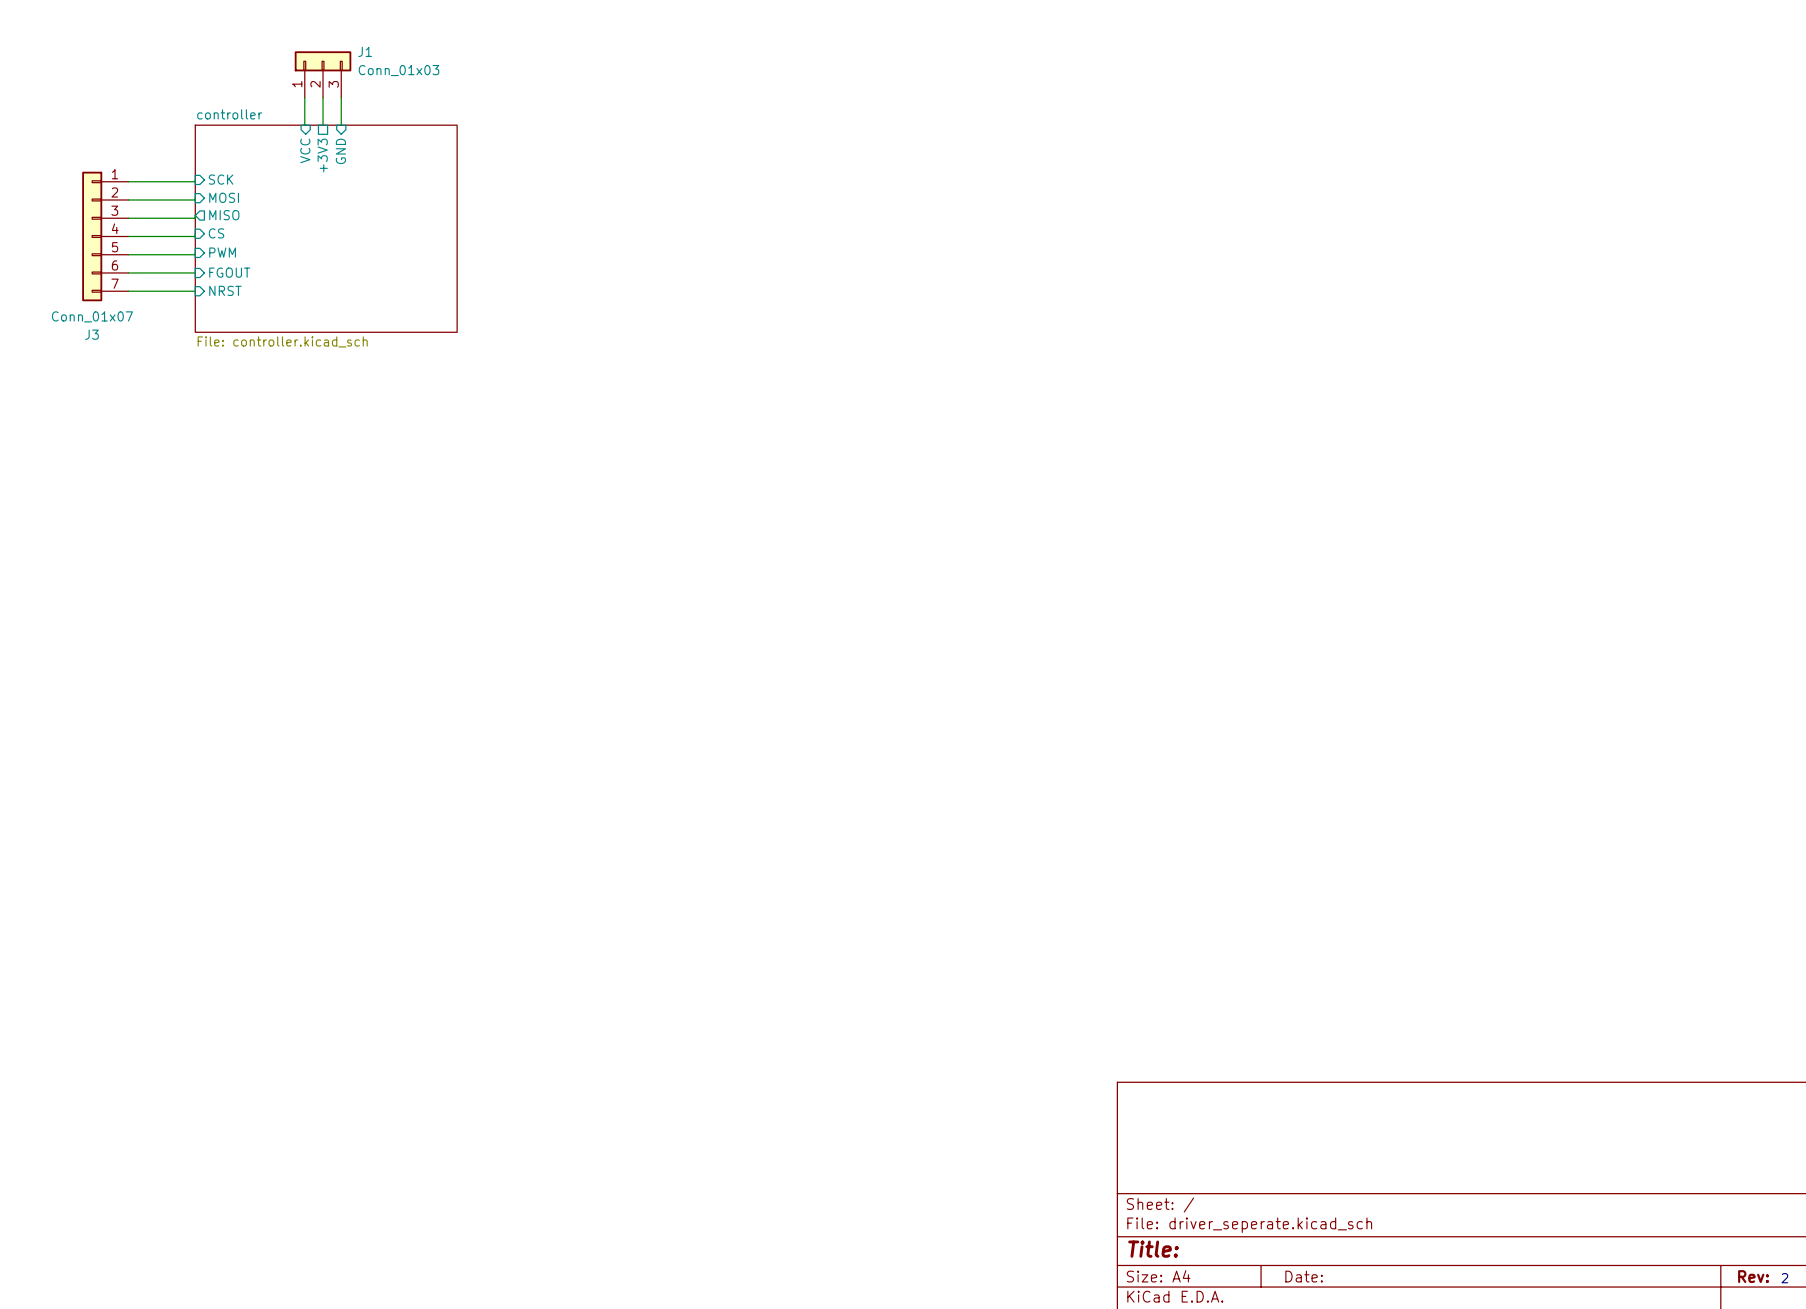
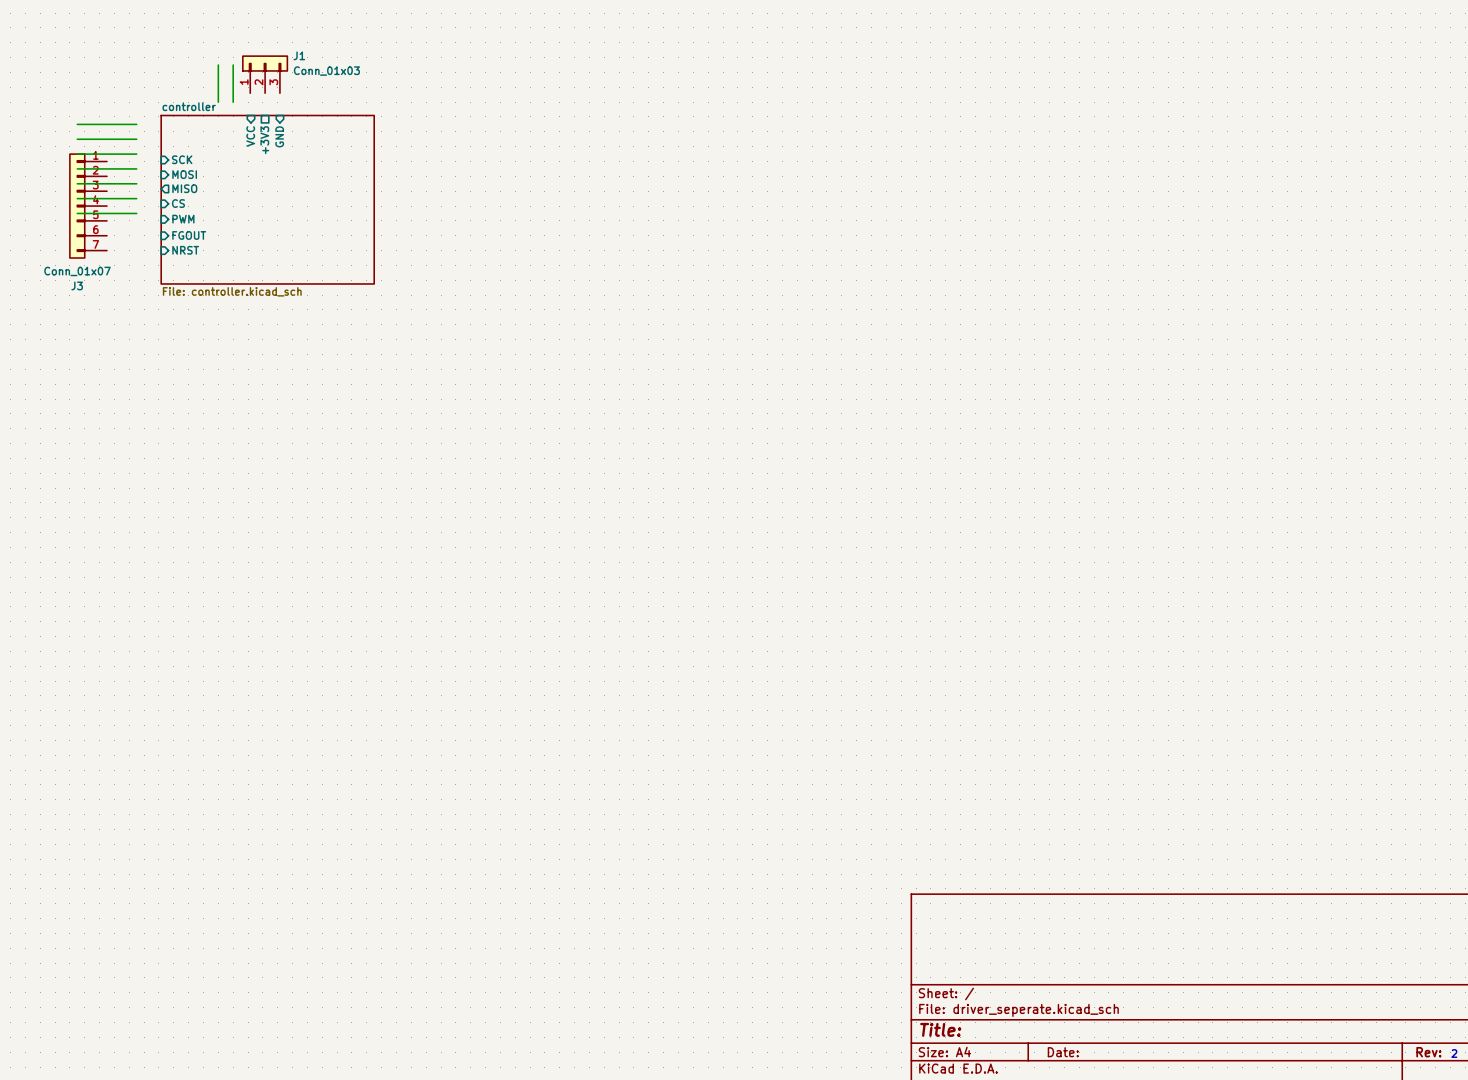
wire: none -> (218, 65) (218, 102)
wire: none -> (233, 65) (233, 102)
wire: (304, 97) (305, 125) -> none
wire: (323, 97) (323, 125) -> none
wire: (341, 97) (341, 125) -> none
wire: none -> (77, 124) (136, 124)
wire: none -> (77, 139) (136, 139)
wire: none -> (77, 154) (136, 154)
wire: (195, 179) (195, 181) (128, 181) -> none
wire: none -> (77, 168) (136, 168)
wire: (195, 198) (195, 199) (128, 199) -> none
wire: none -> (77, 183) (136, 183)
wire: (195, 215) (195, 218) (128, 218) -> none
wire: none -> (77, 198) (136, 198)
wire: (195, 233) (195, 236) (128, 236) -> none
wire: none -> (77, 213) (136, 213)
wire: (195, 252) (195, 254) (128, 254) -> none
wire: (128, 272) (195, 272) -> none
wire: (128, 291) (195, 291) -> none

